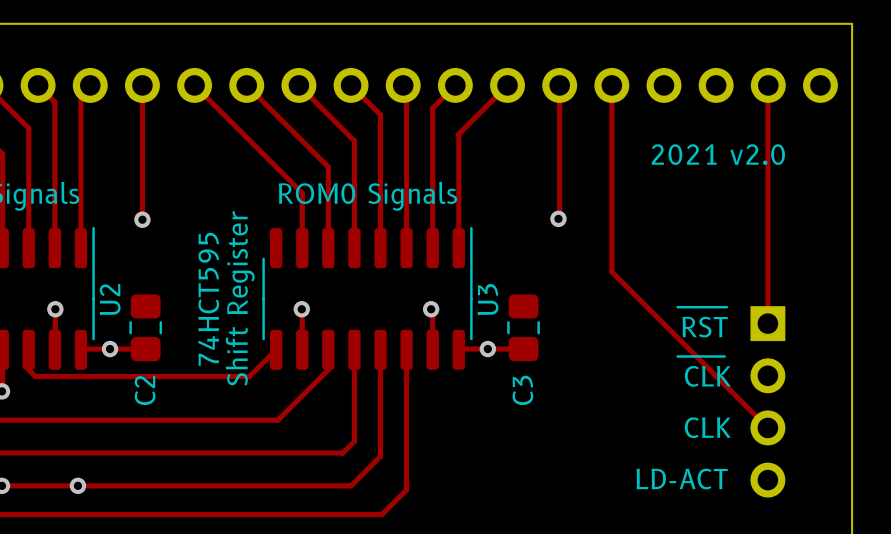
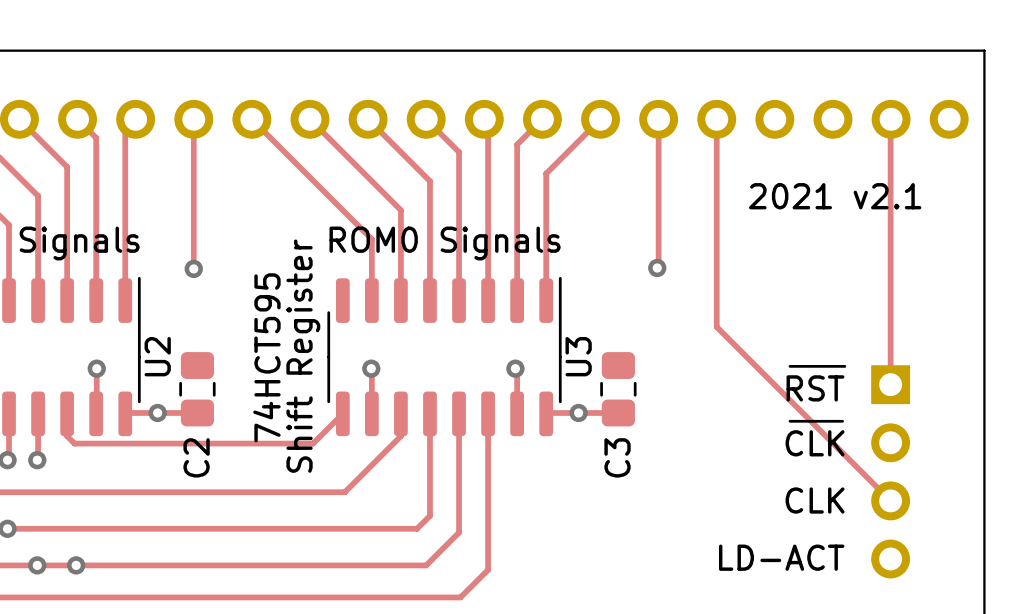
text: 2021 v2.0 (718, 154) -> 2021 v2.1 (835, 196)
via position: (77, 485) -> (76, 565)

